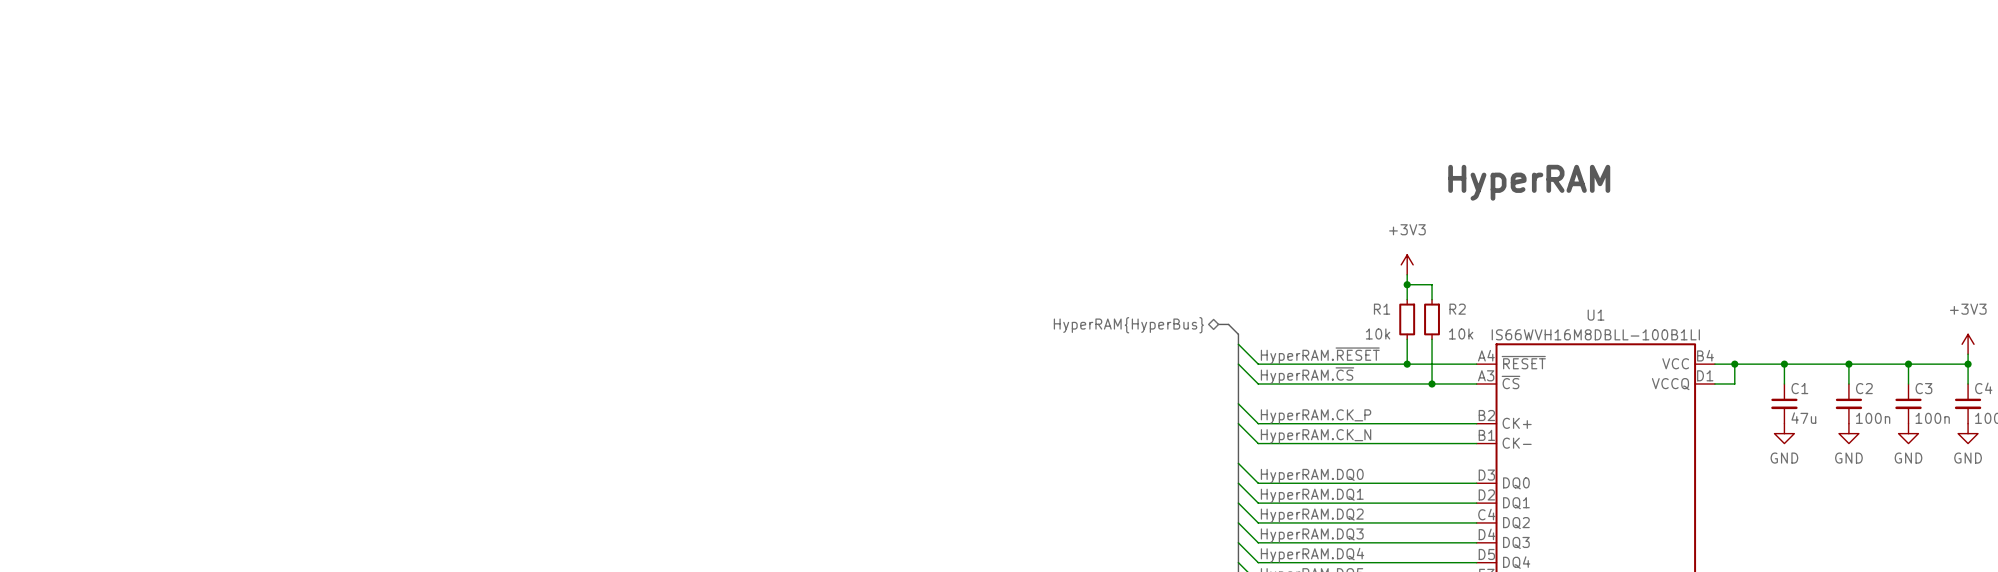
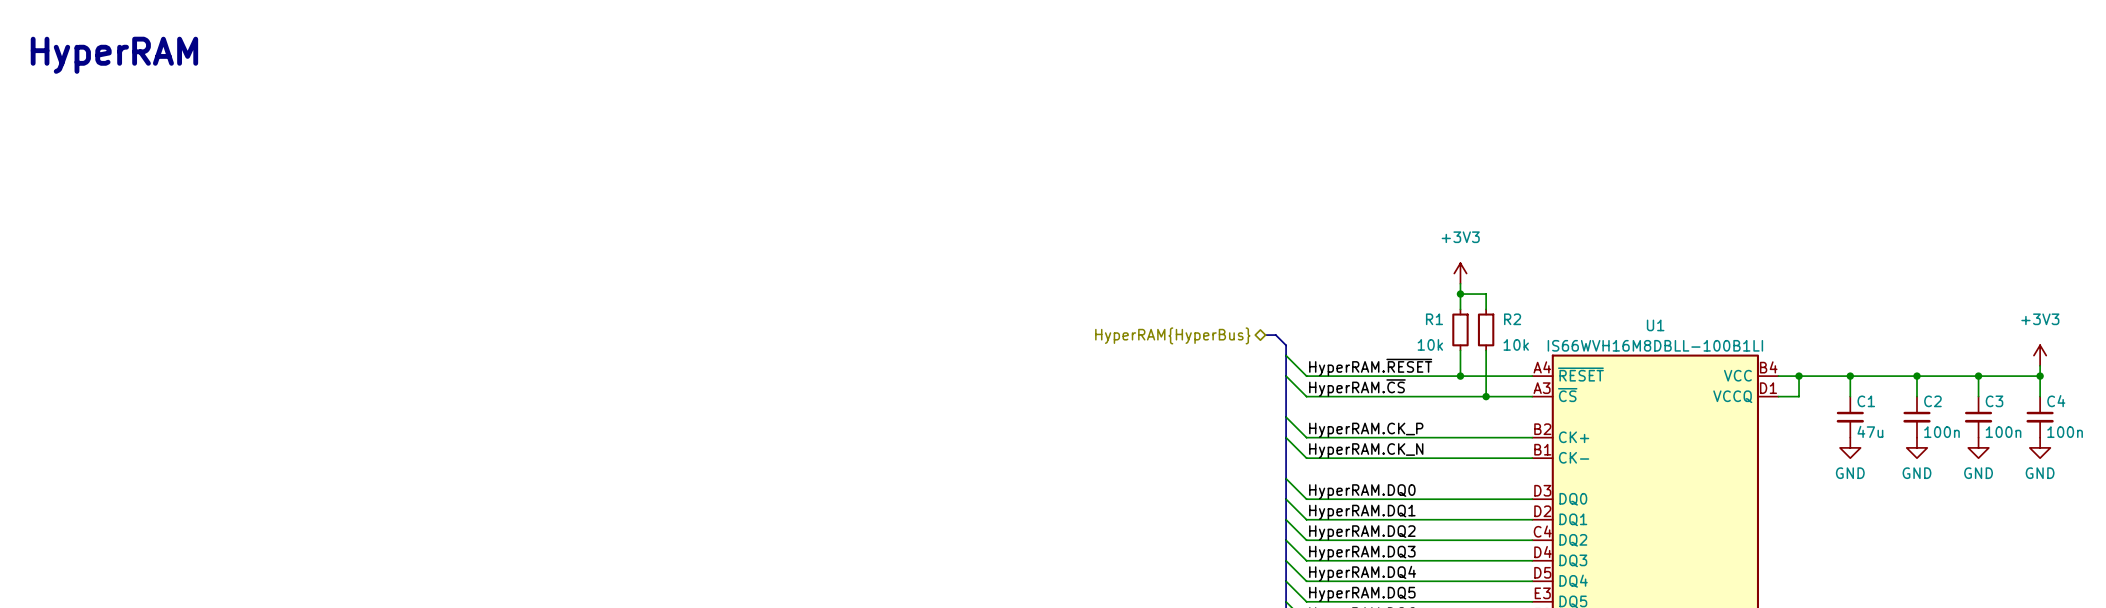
text: none -> HyperRAM (114, 55)
text: HyperRAM (1529, 182) -> none

